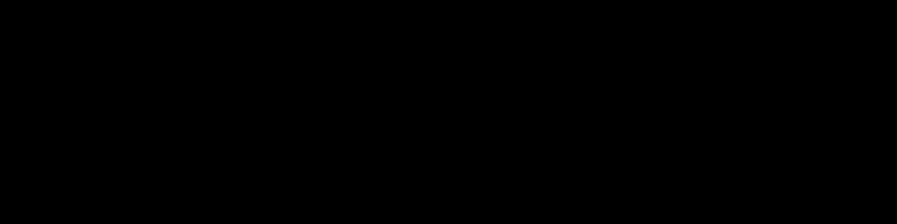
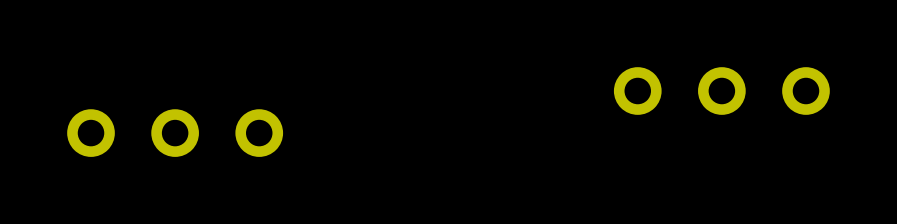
part: none -> (721, 91)
part: none -> (175, 133)

